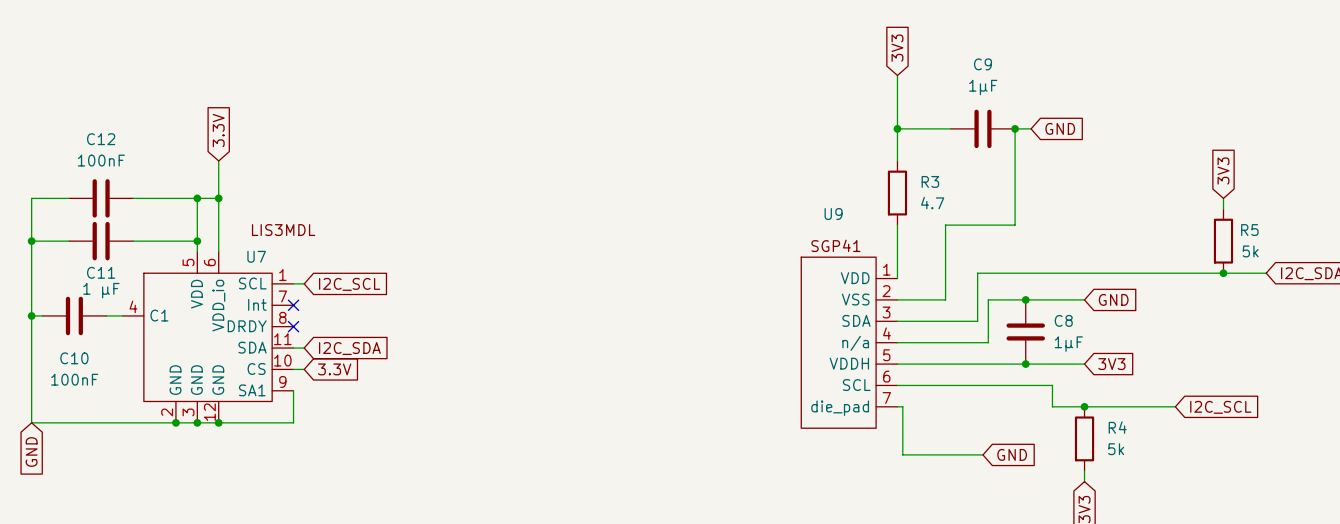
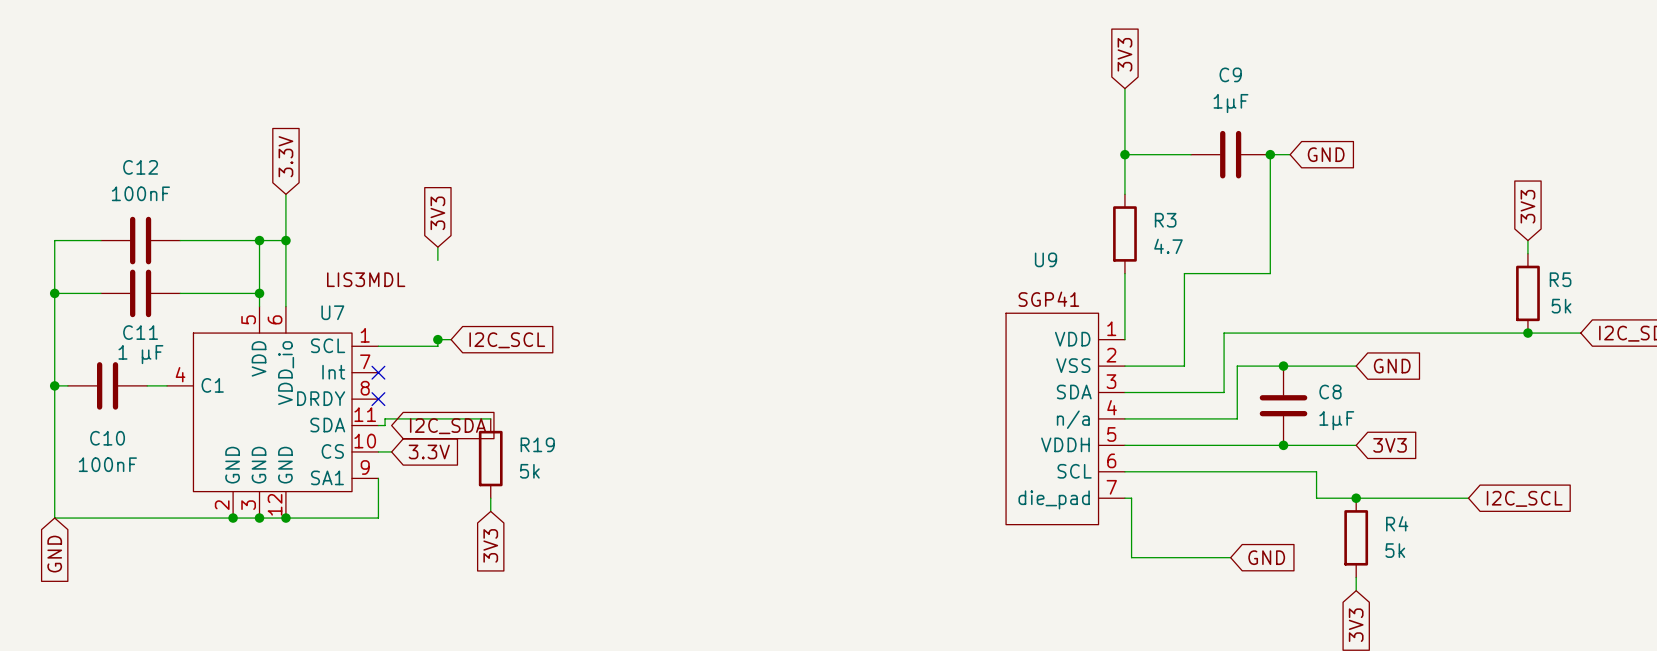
global label: none -> 3V3 (437, 213)
wire: none -> (437, 247) (437, 260)
junction: none -> (437, 339)
wire: none -> (451, 339) (437, 339) (437, 346) (391, 346)
global label position: I2C_SCL (349, 284) -> I2C_SCL (507, 340)
wire: (298, 348) (304, 348) -> (385, 425) (385, 418) (490, 418)
R19: none -> 5k (490, 458)
wire: none -> (490, 498) (490, 511)
global label: none -> 3V3 (490, 545)

